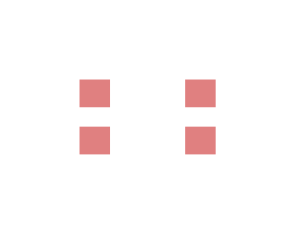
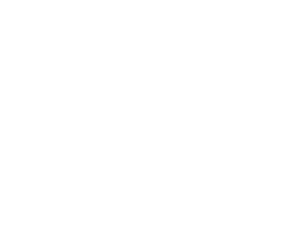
part: (94, 116) -> none
part: (200, 116) -> none

